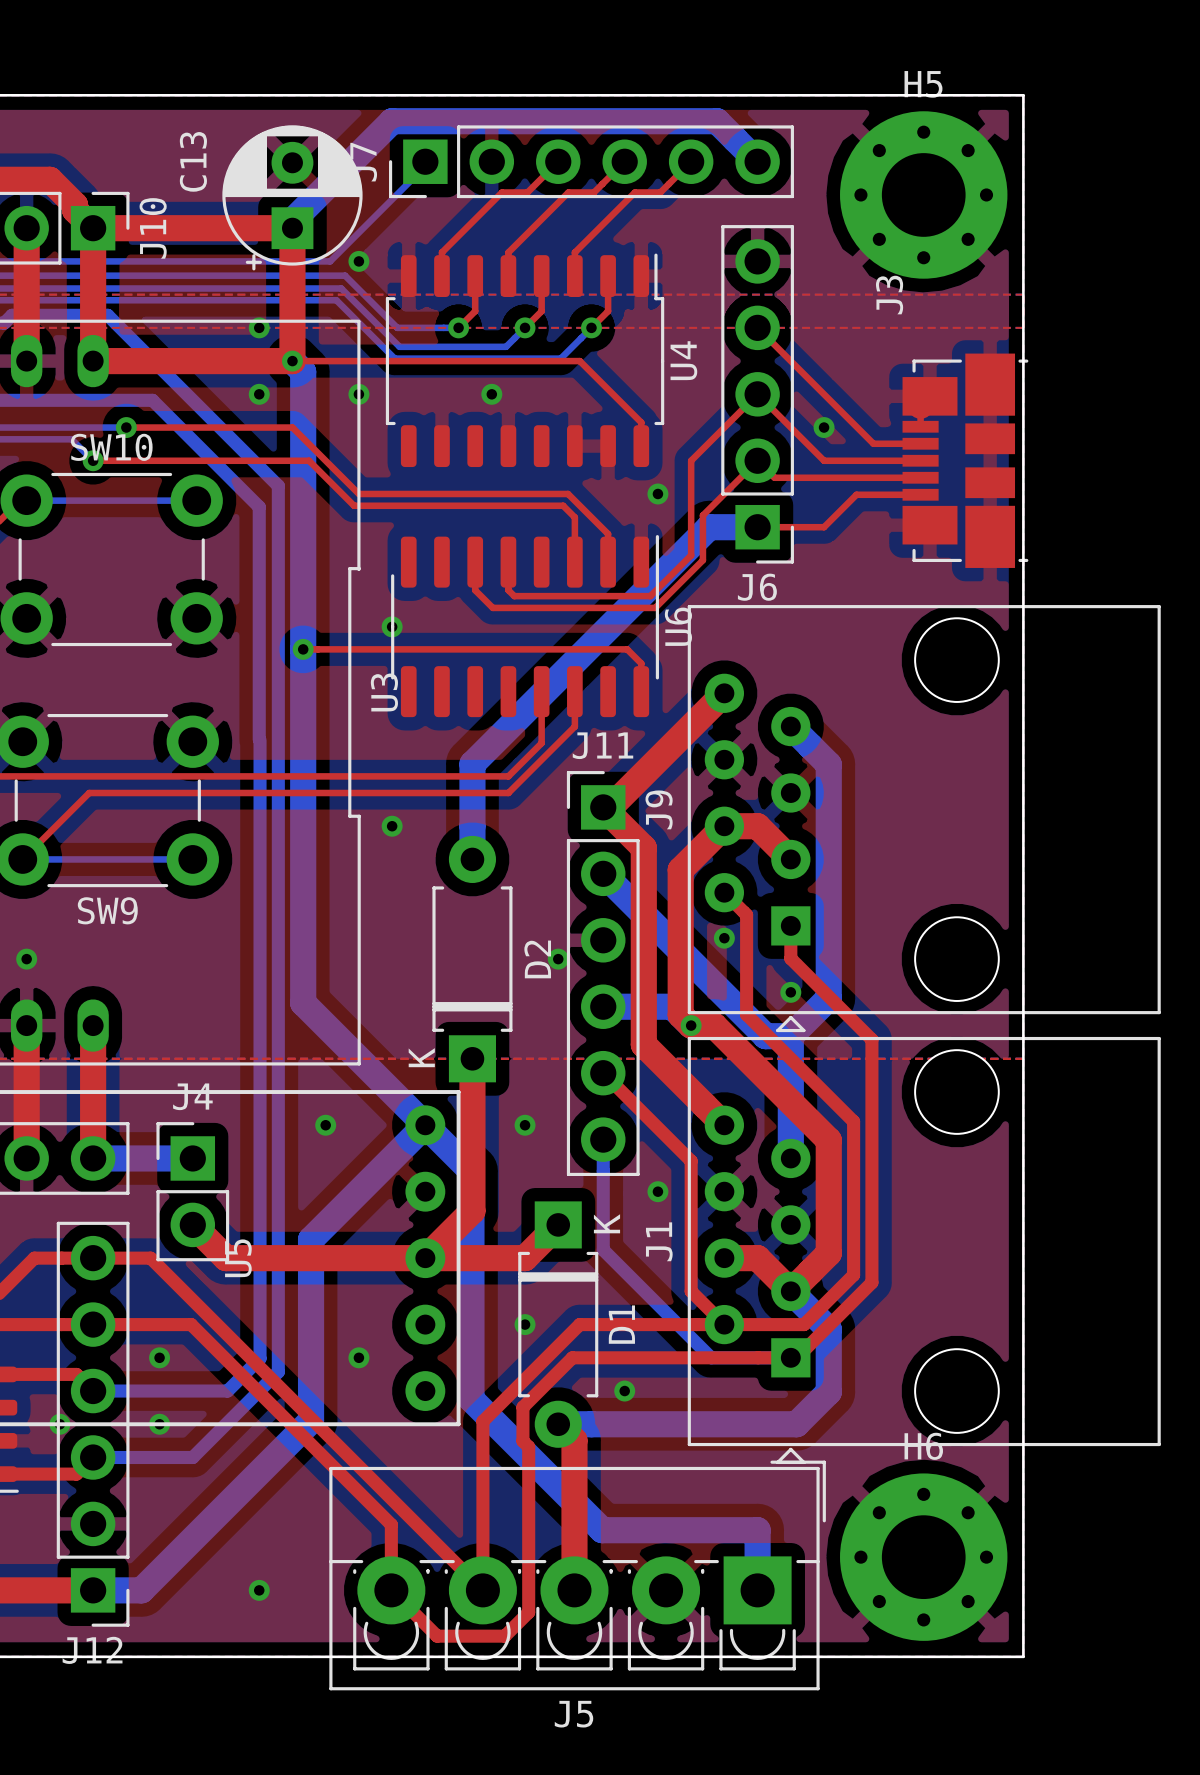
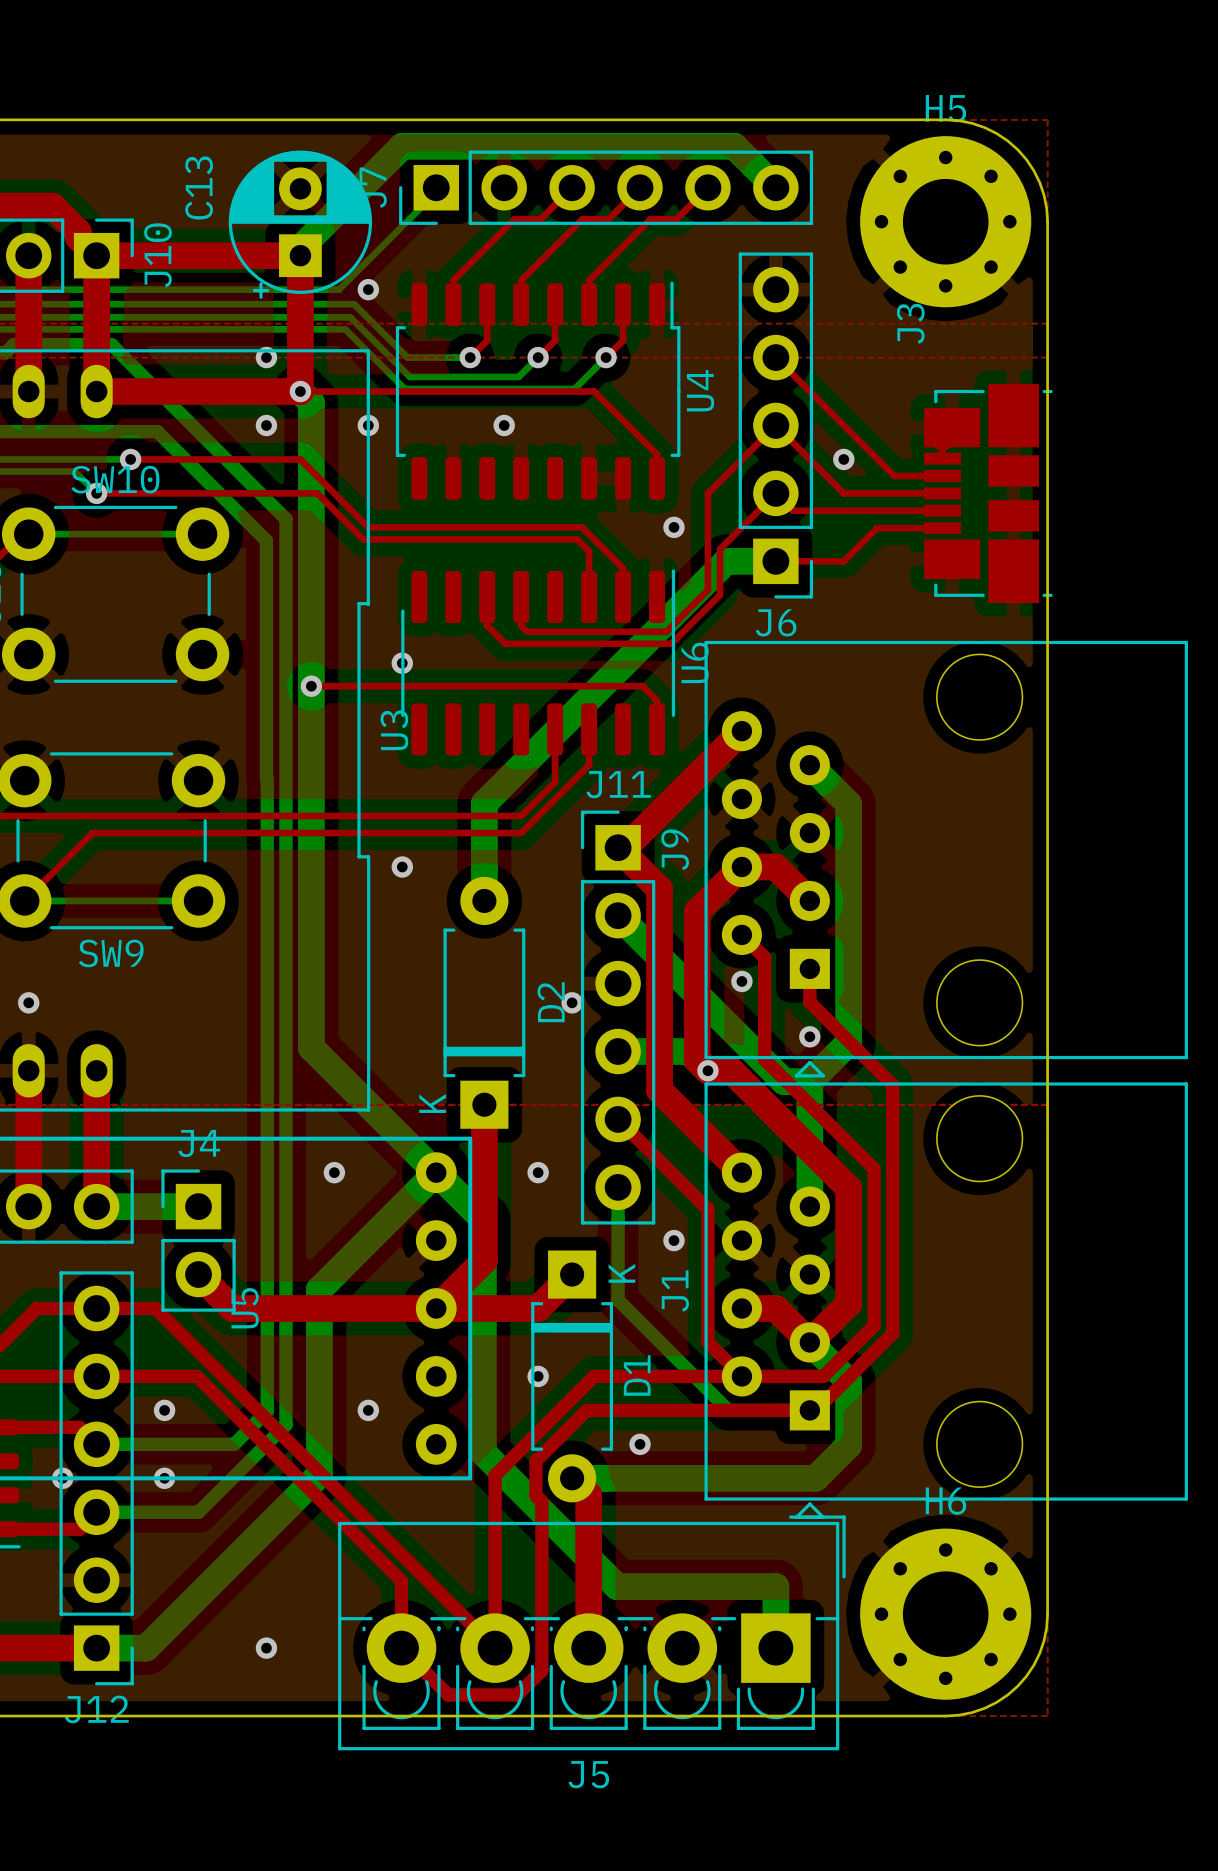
board edge: (923, 95) (1023, 95) (1023, 194) -> (945, 119) (972, 123) (984, 127) (996, 133) (1017, 149) (1033, 170) (1039, 182) (1046, 208) (1047, 221)
board edge: (1023, 1557) (1023, 1656) (923, 1656) -> (1047, 1614) (1046, 1627) (1039, 1653) (1033, 1665) (1017, 1686) (996, 1702) (984, 1708) (959, 1715) (945, 1716)

